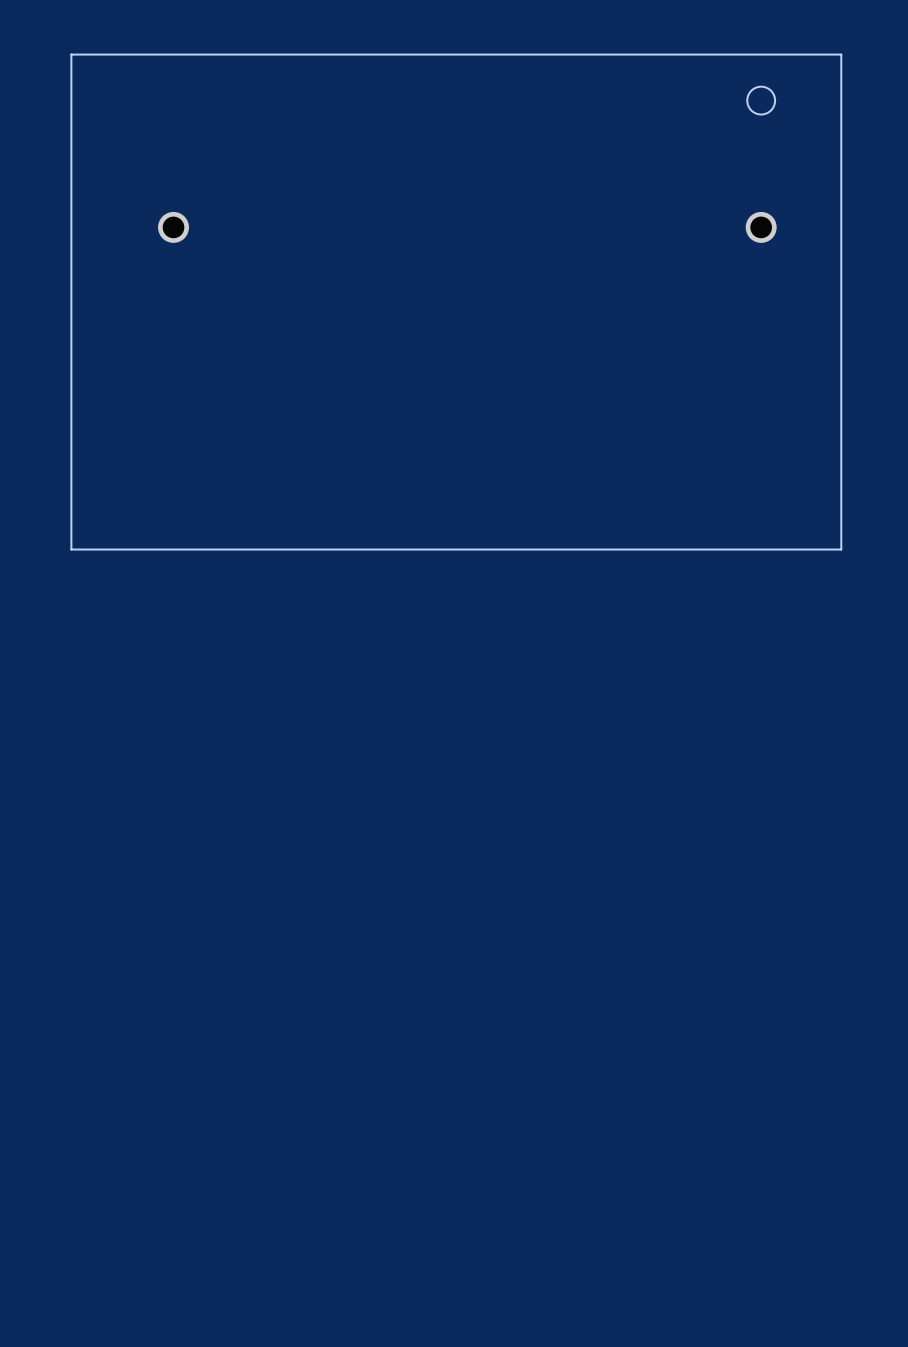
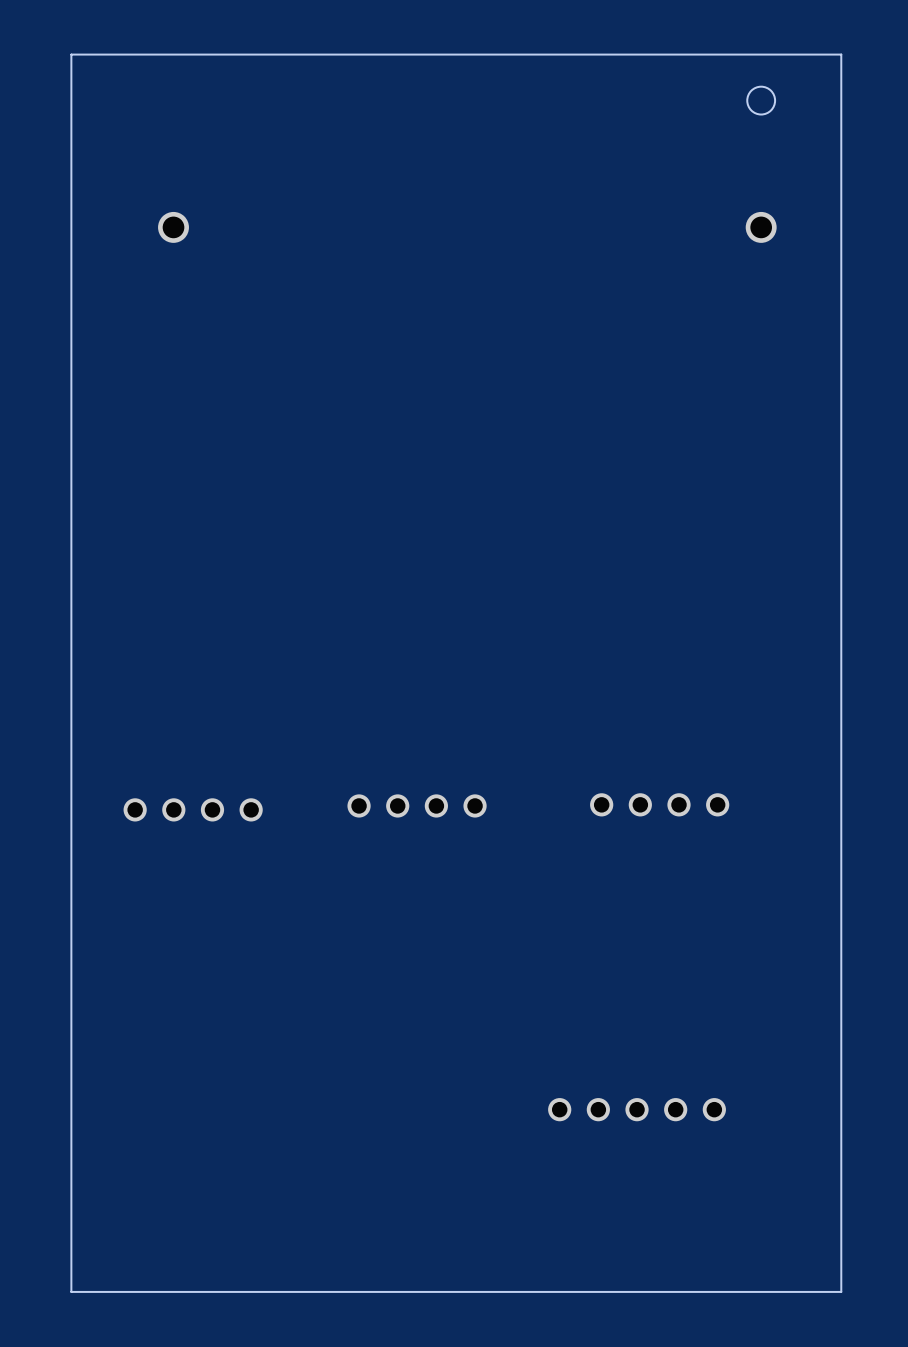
board edge: (841, 549) (71, 549) -> (841, 549) (841, 1291) (71, 1291) (71, 549)
part: none -> (659, 804)
part: none -> (417, 805)
part: none -> (193, 809)
part: none -> (637, 1109)

